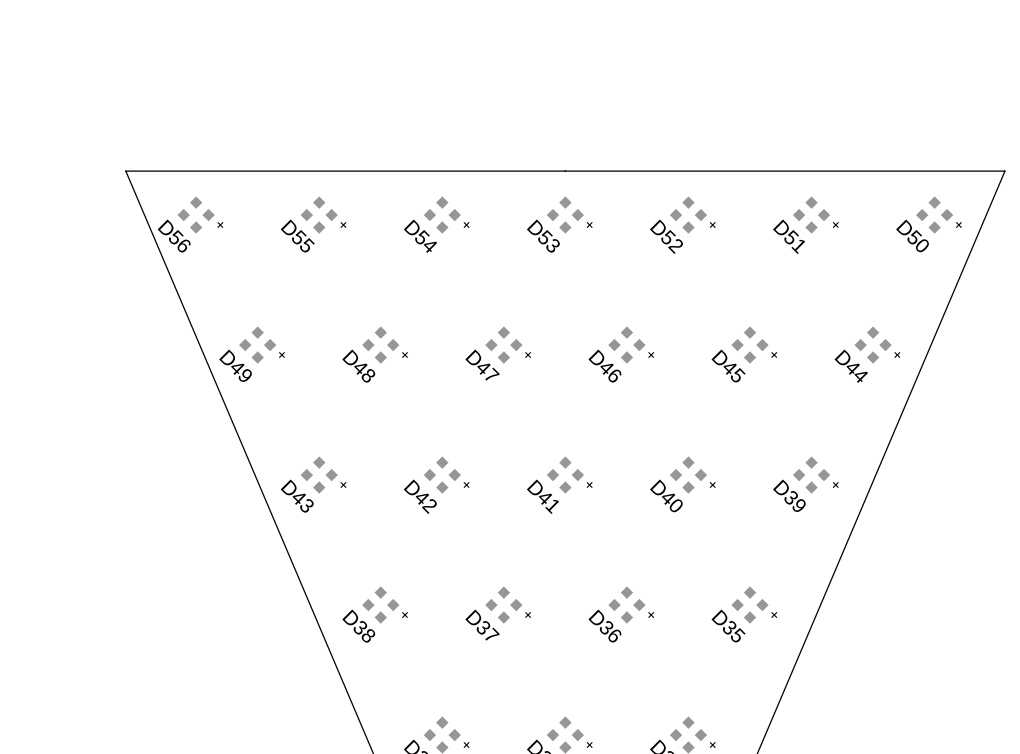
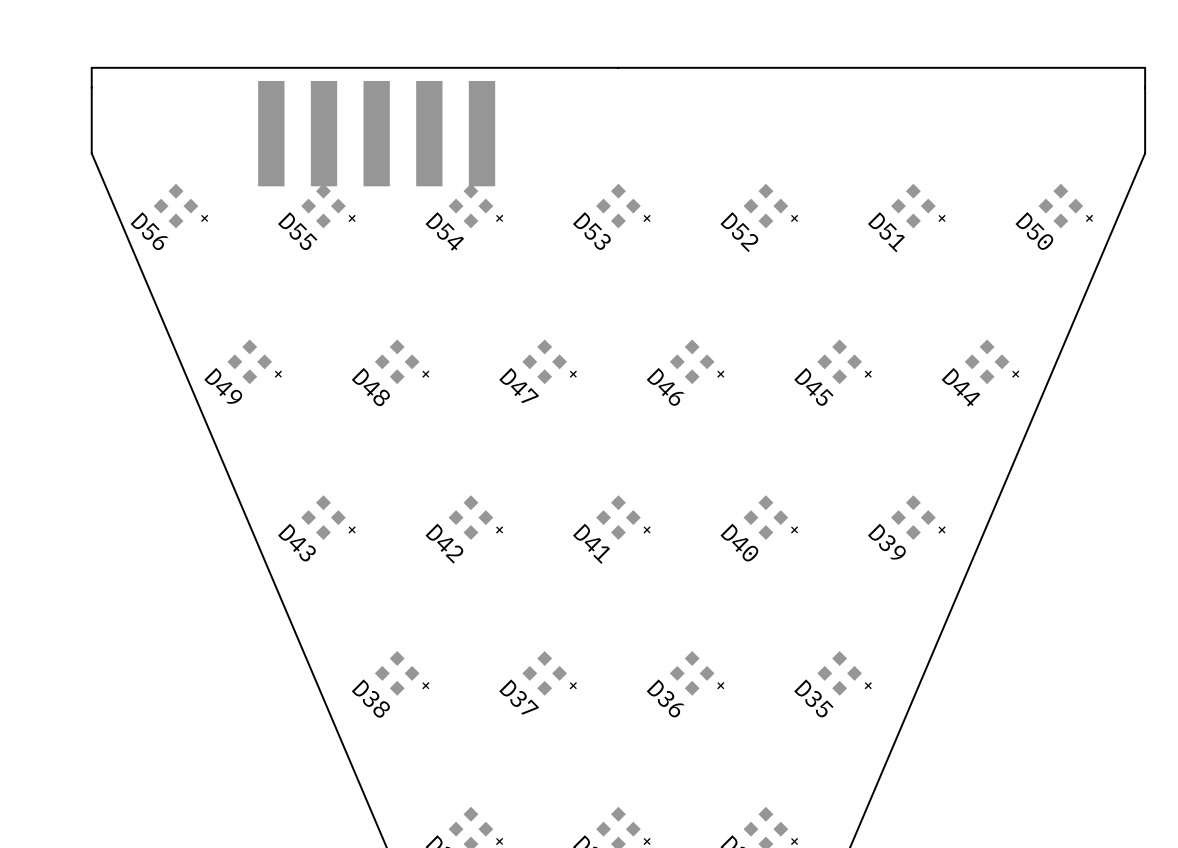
part: none -> (376, 127)
board edge: (125, 171) (1004, 171) -> (91, 153) (91, 67) (1145, 67) (1145, 153)

